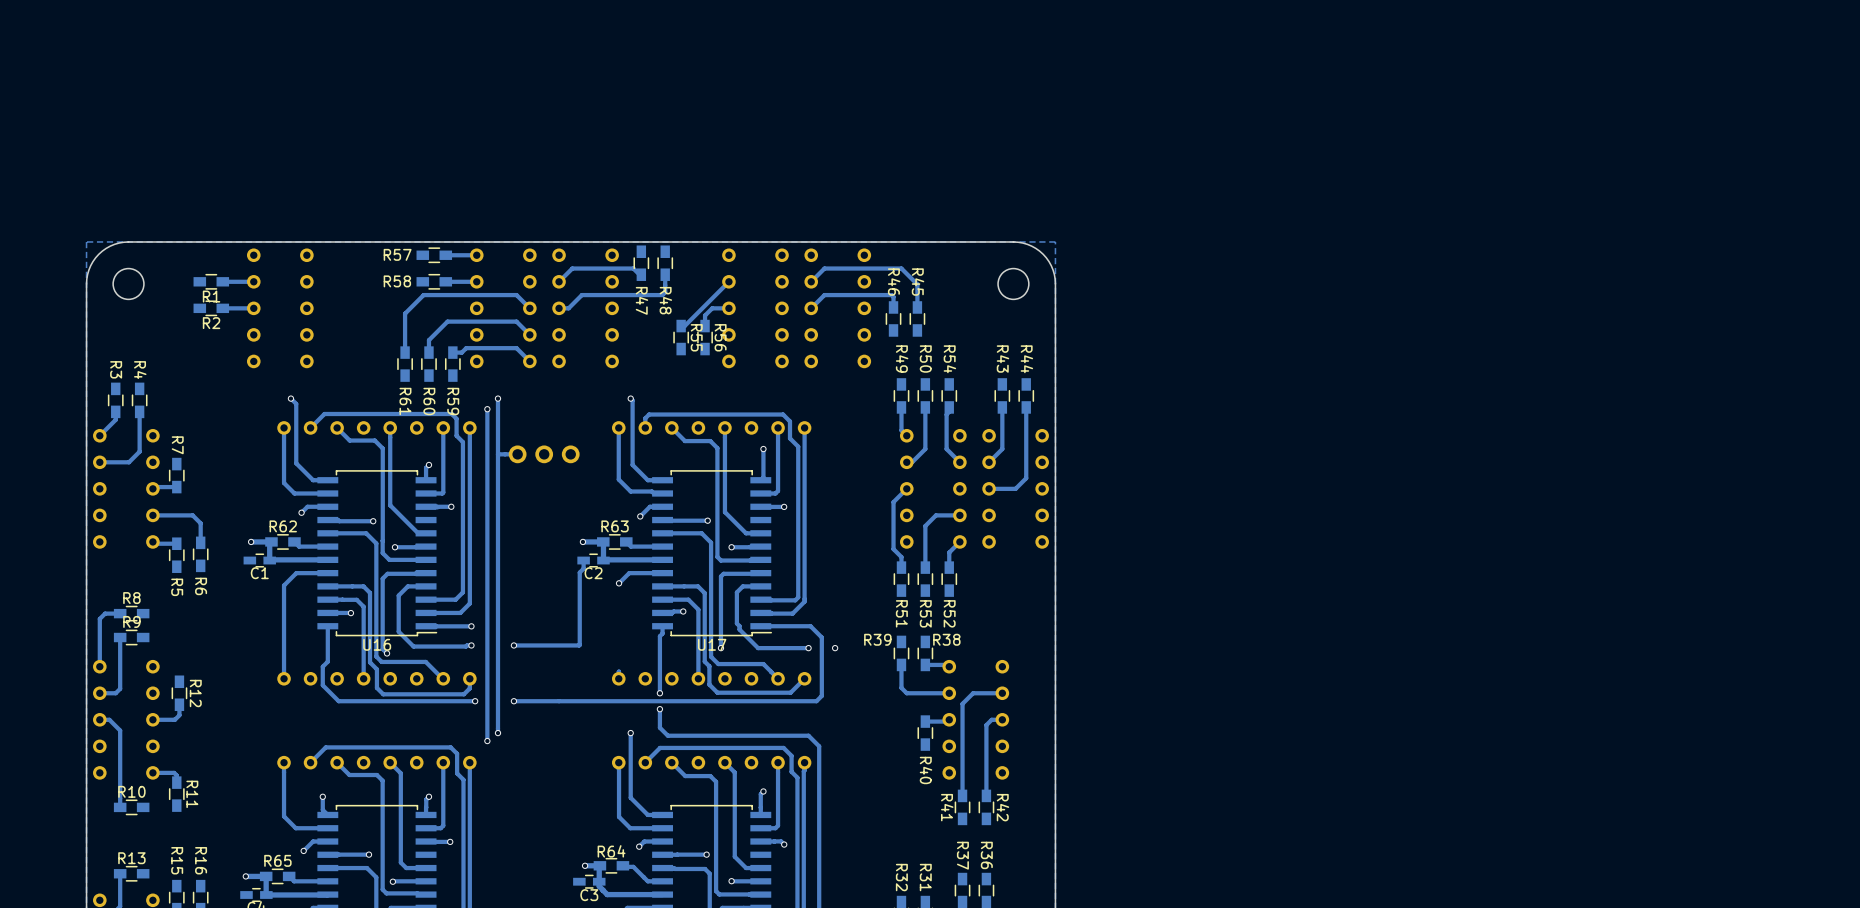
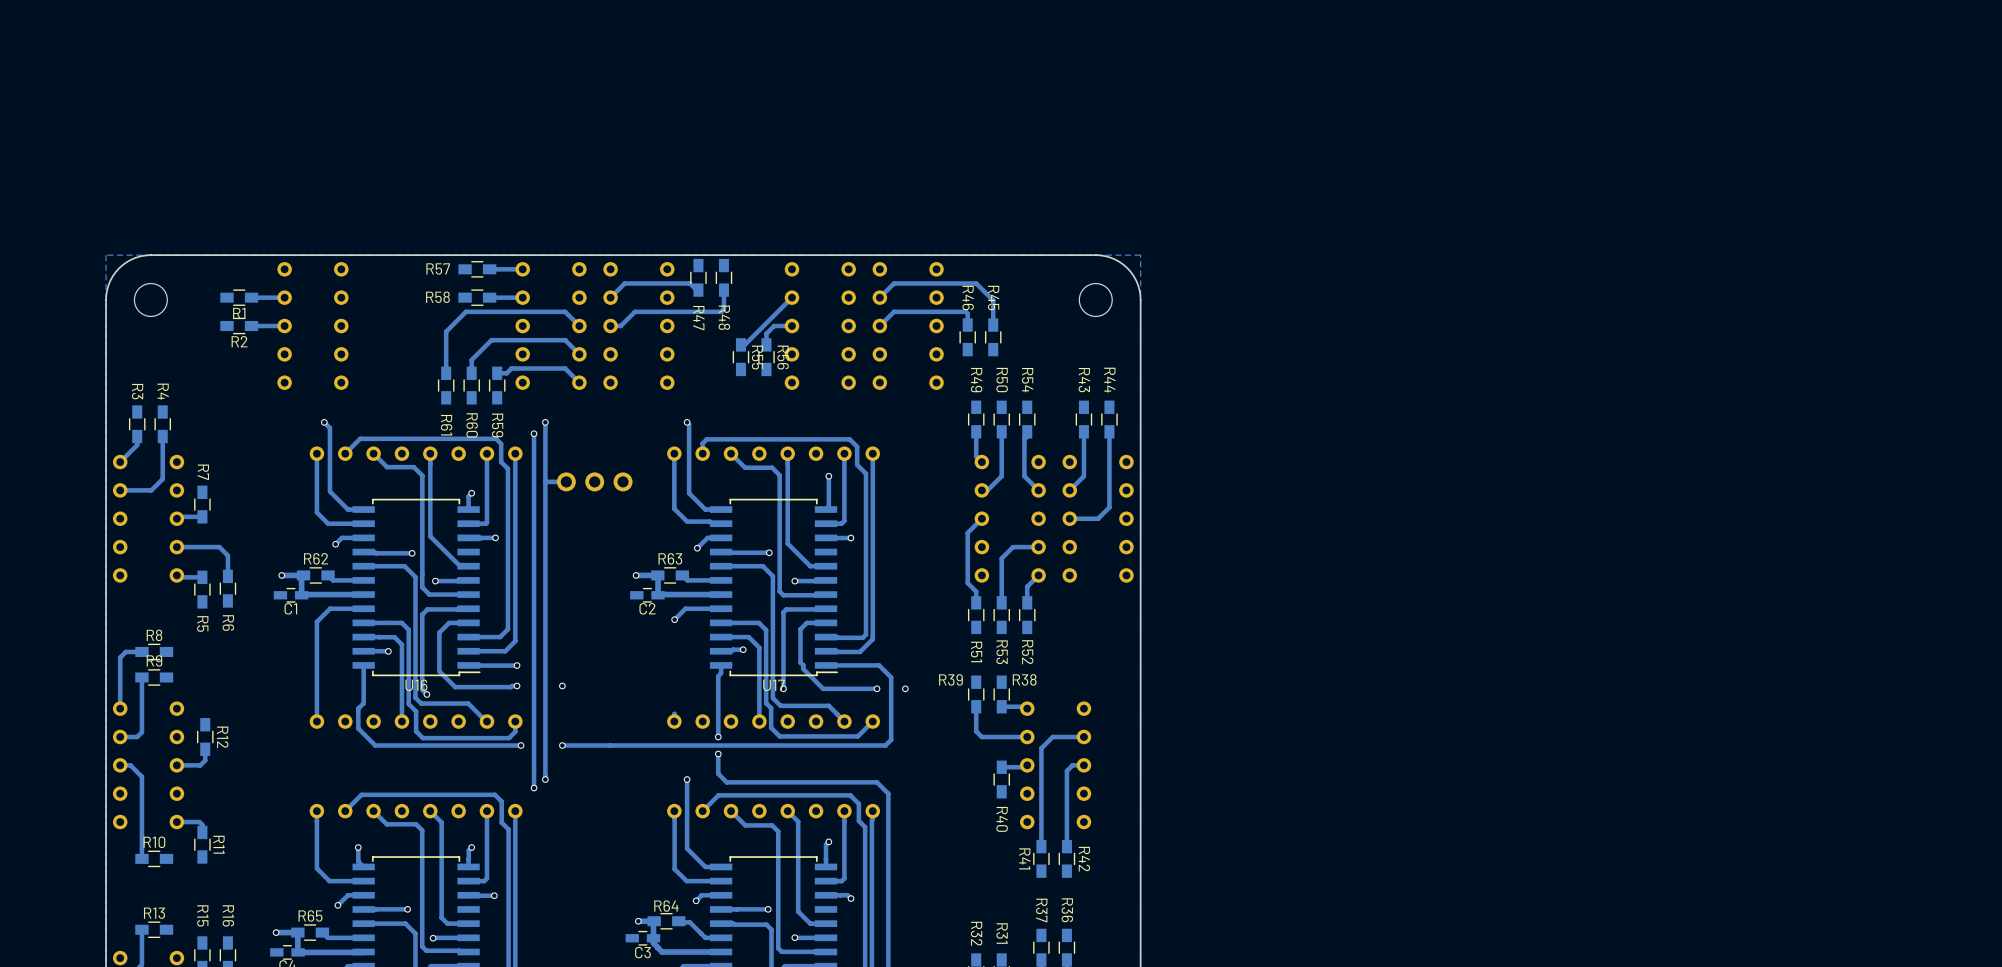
track: (583, 560) (583, 568) (579, 572) (579, 644) (513, 645) -> none

